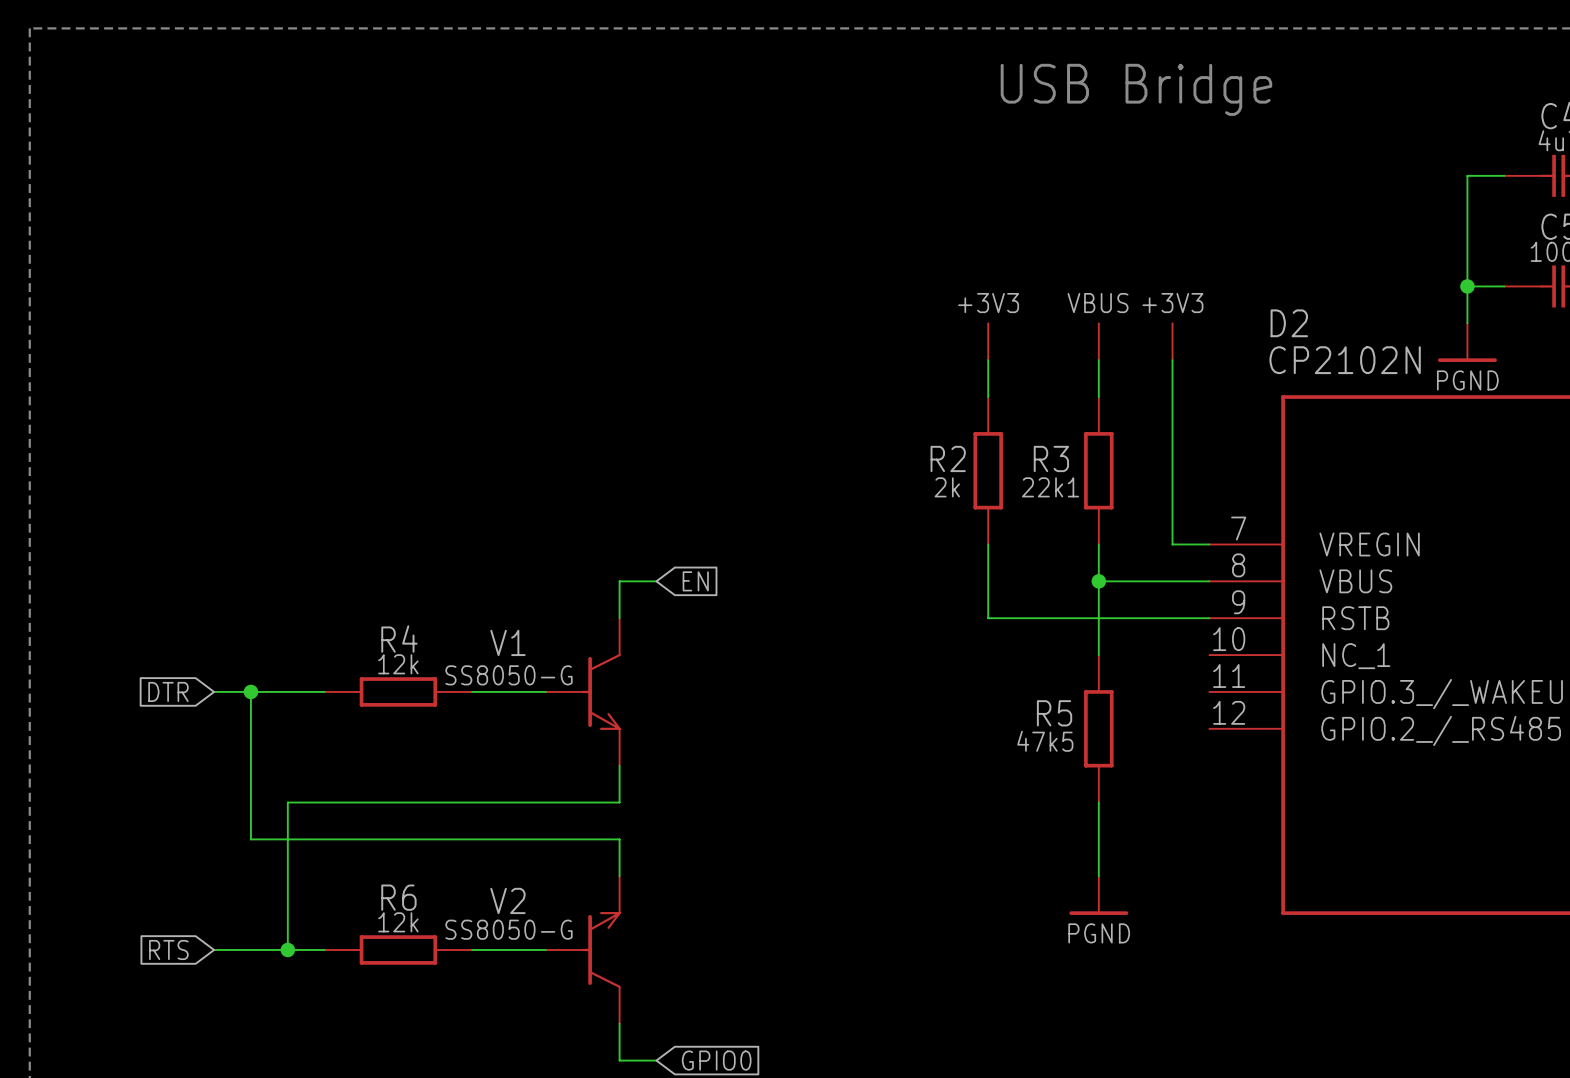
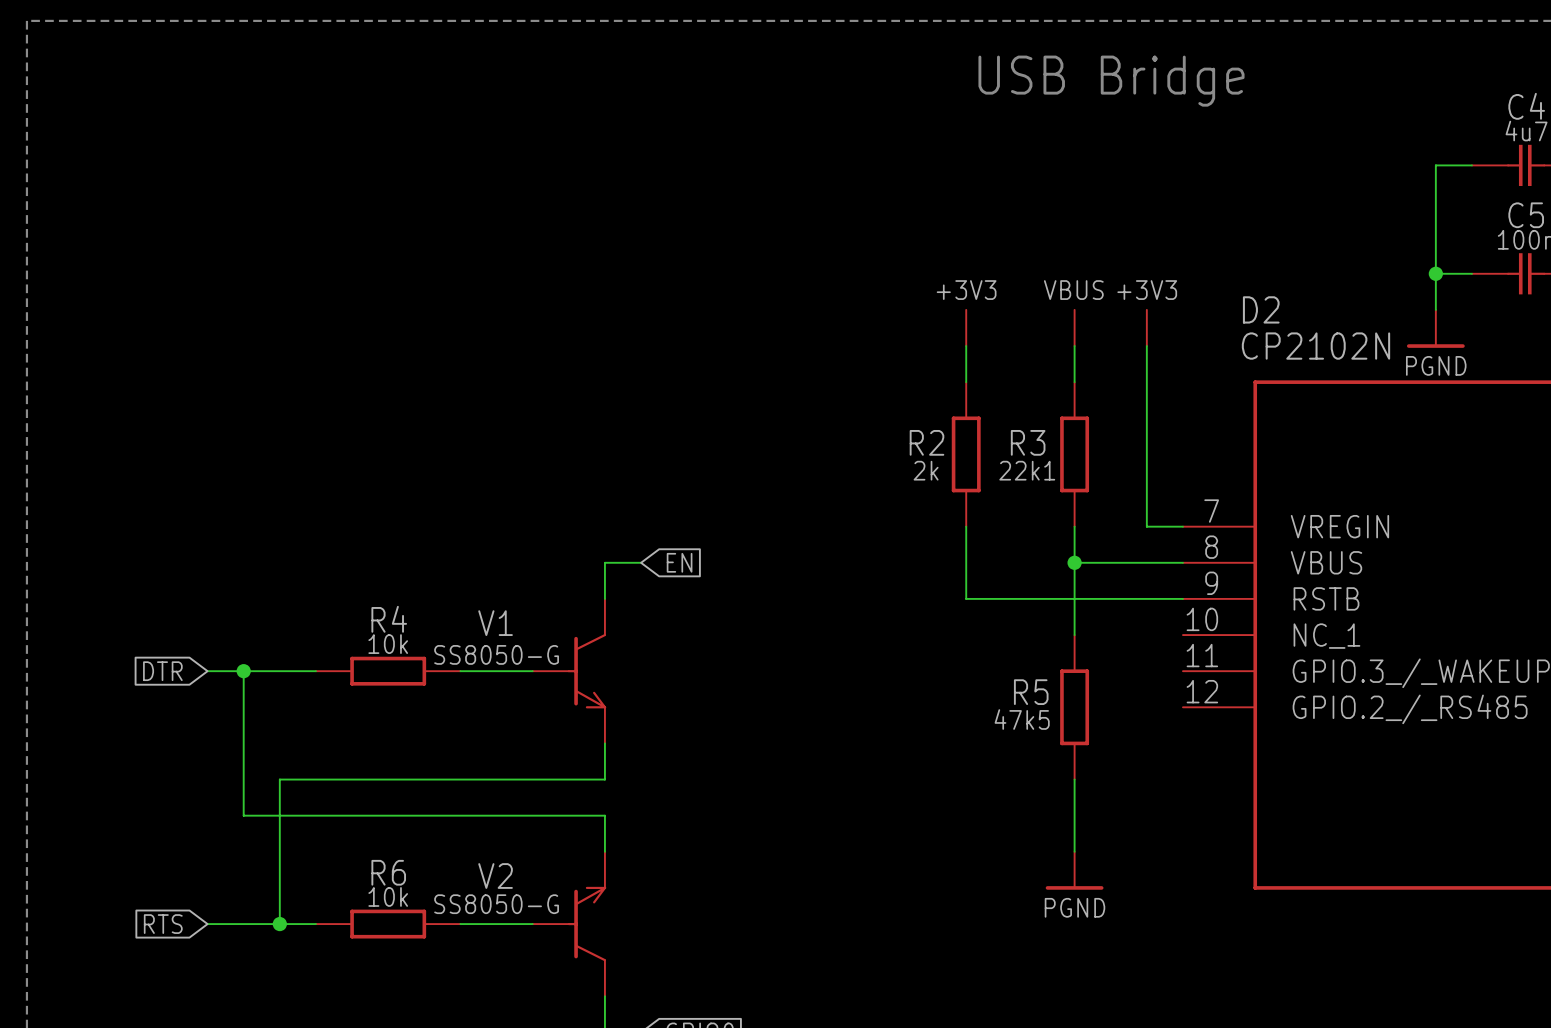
R4 value: 12k (398, 664) -> 10k (388, 644)
R6 value: 12k (398, 922) -> 10k (388, 896)

